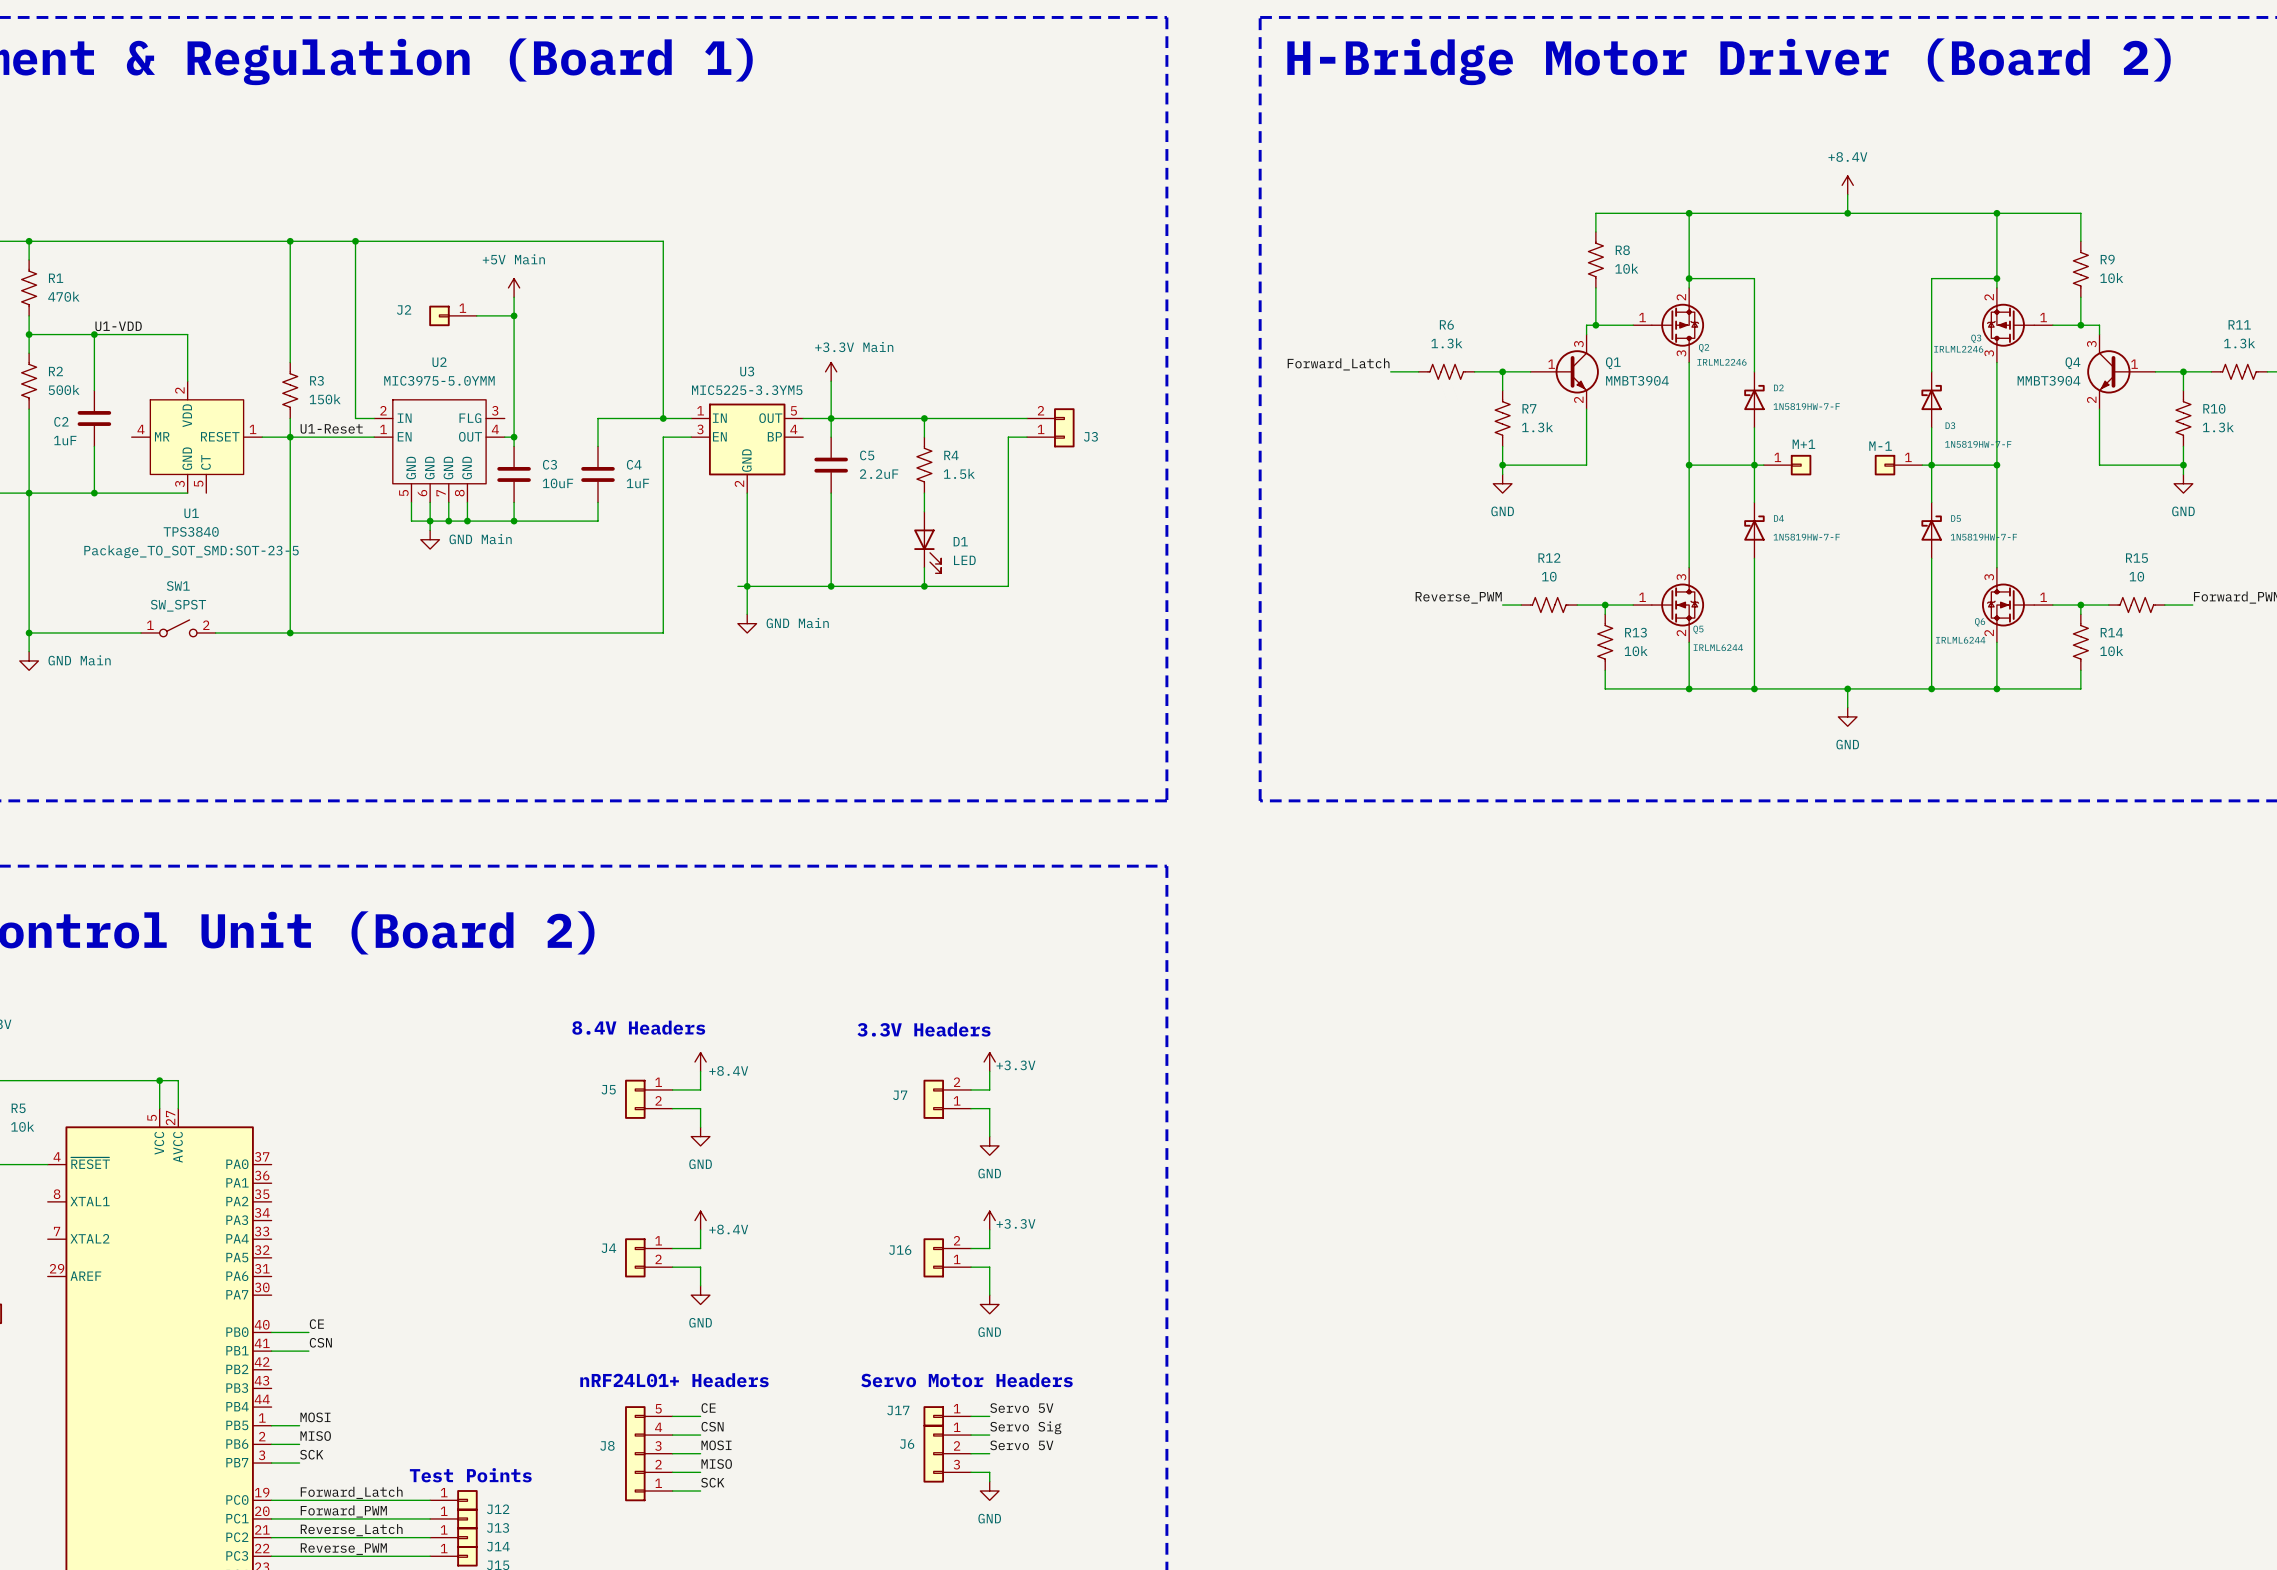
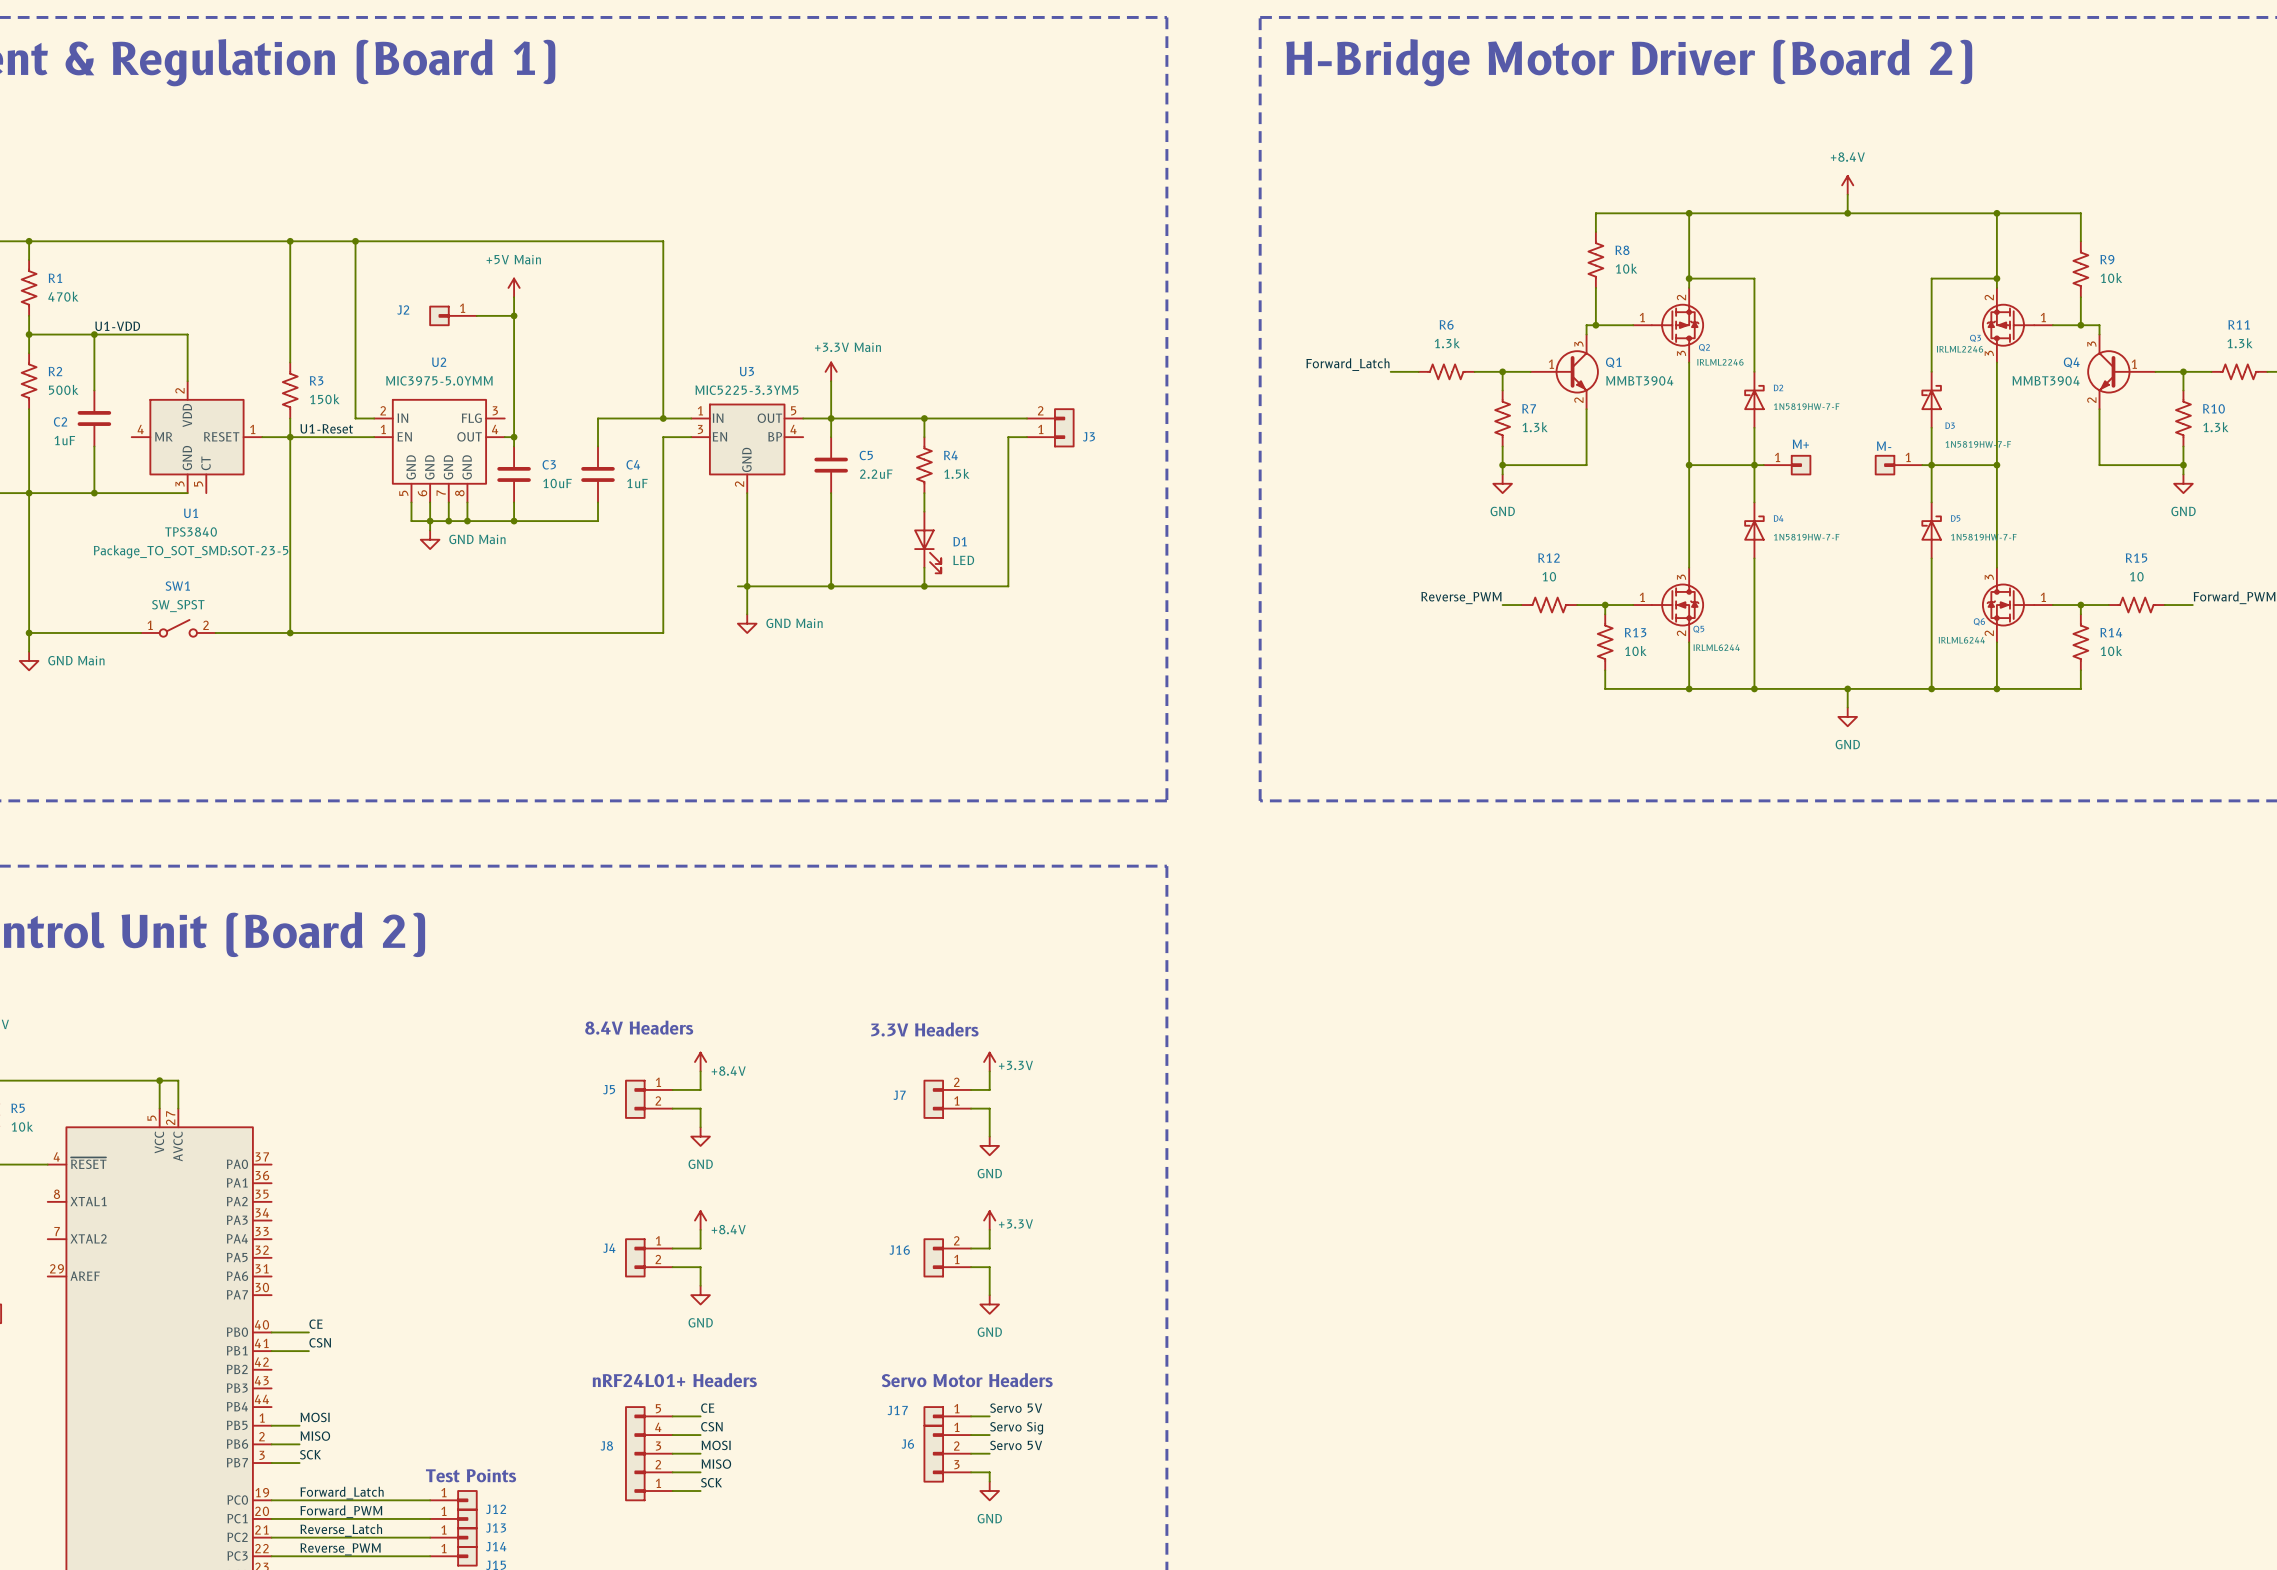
M+1 name: M+1 (1803, 444) -> M+ (1800, 444)
M-1 name: M-1 (1880, 446) -> M- (1884, 446)

